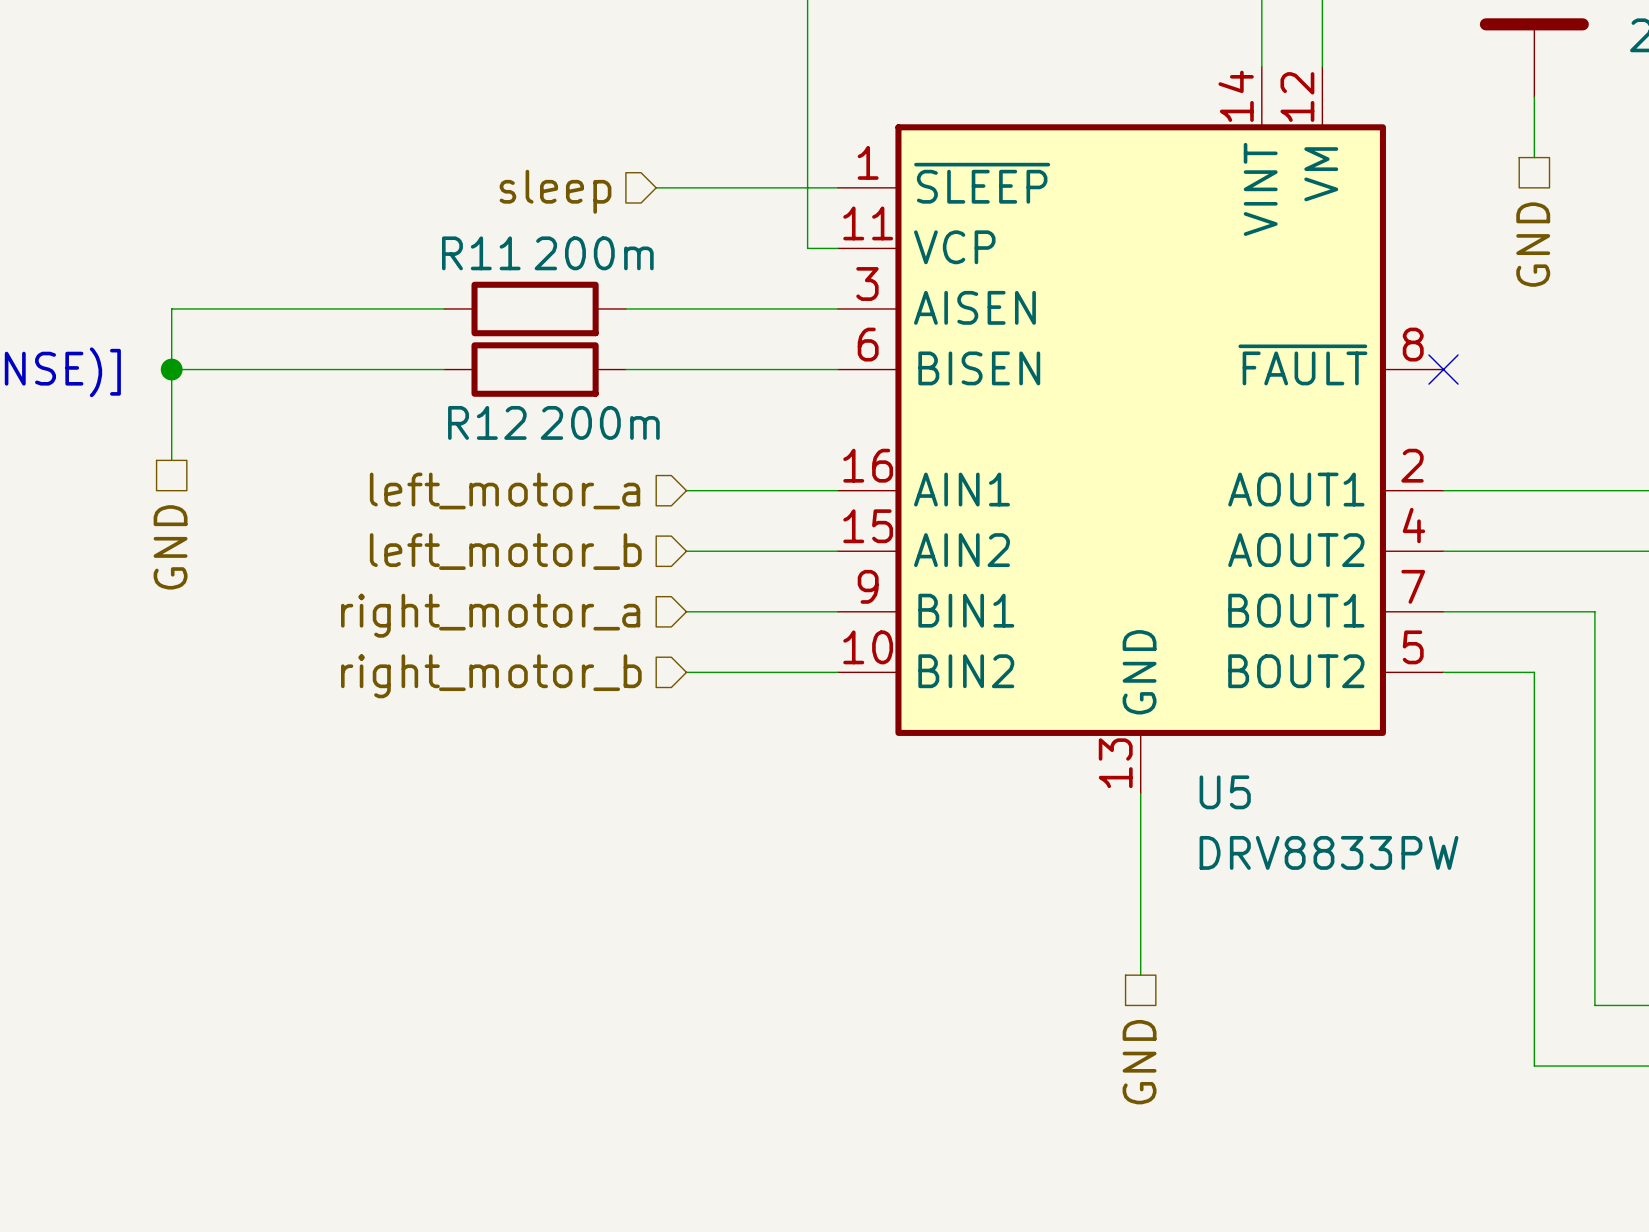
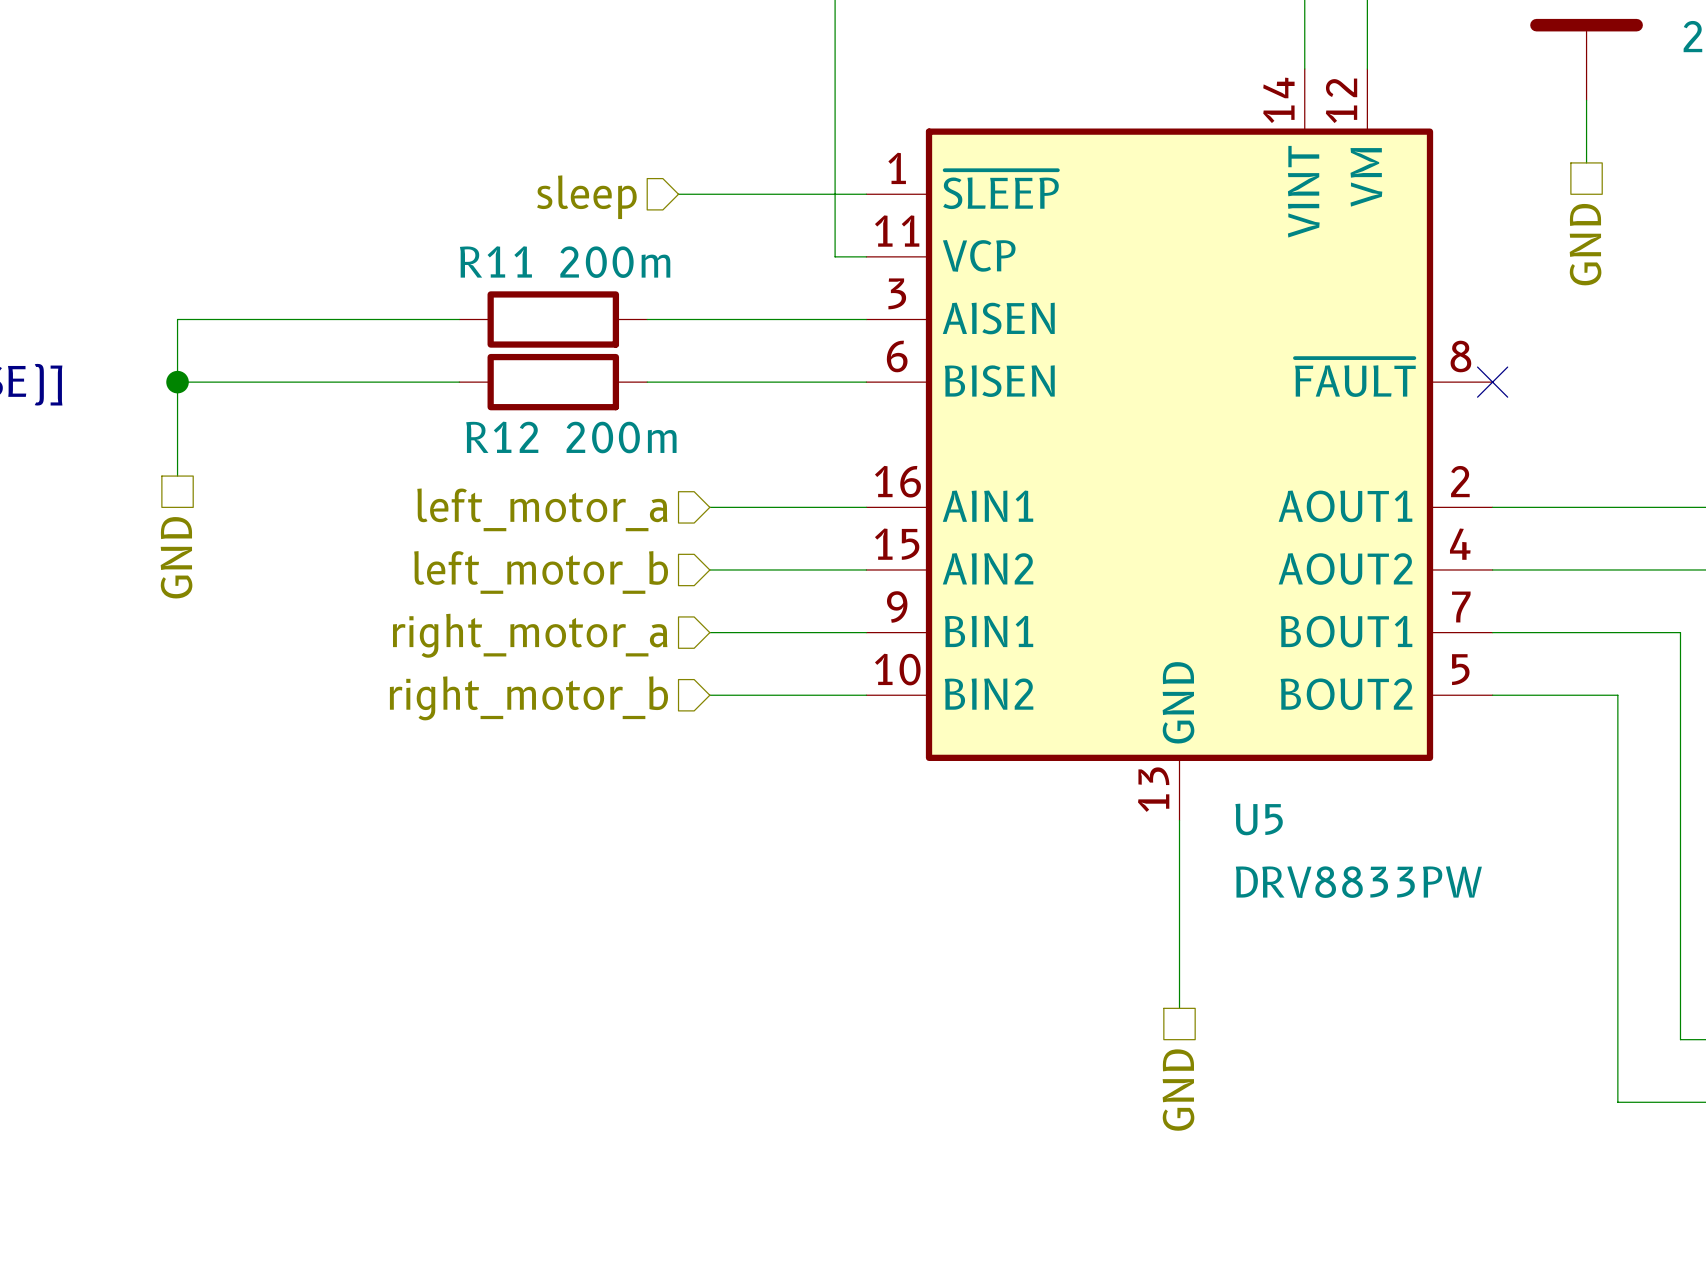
wire: (1594, 611) (1594, 1005) (1625, 1005) -> (1649, 632) (1680, 632) (1680, 1039)
wire: (1534, 672) (1534, 1066) (1564, 1066) -> (1586, 695) (1617, 695) (1617, 1102)

